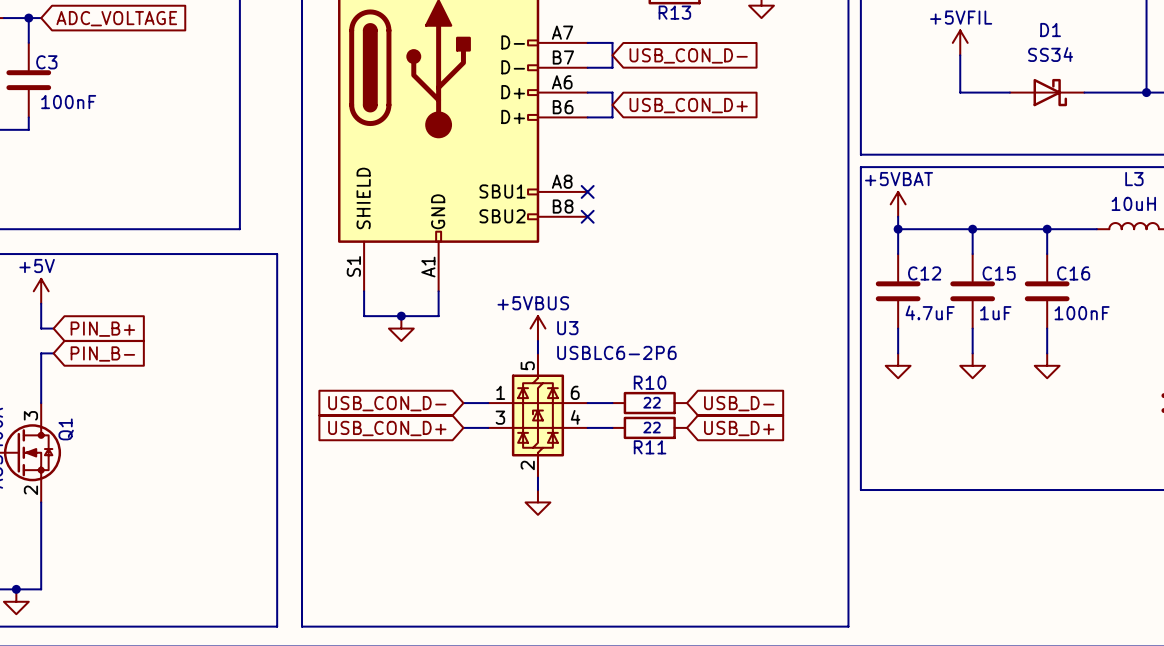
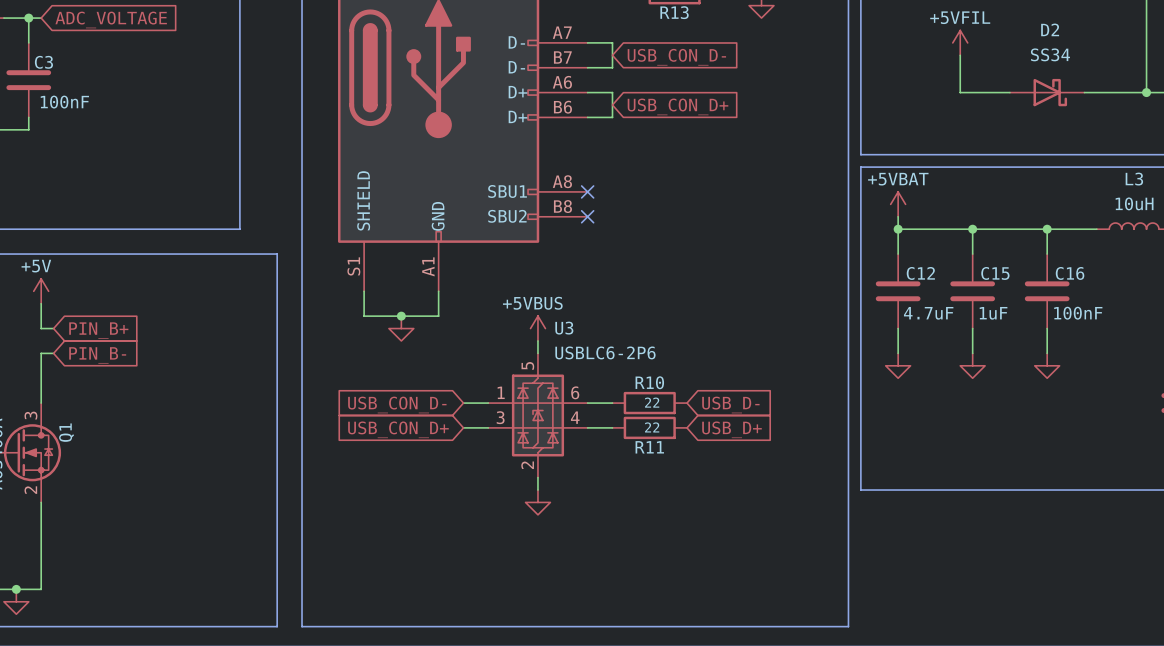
D1 name: D1 (1050, 30) -> D2 (1050, 29)

